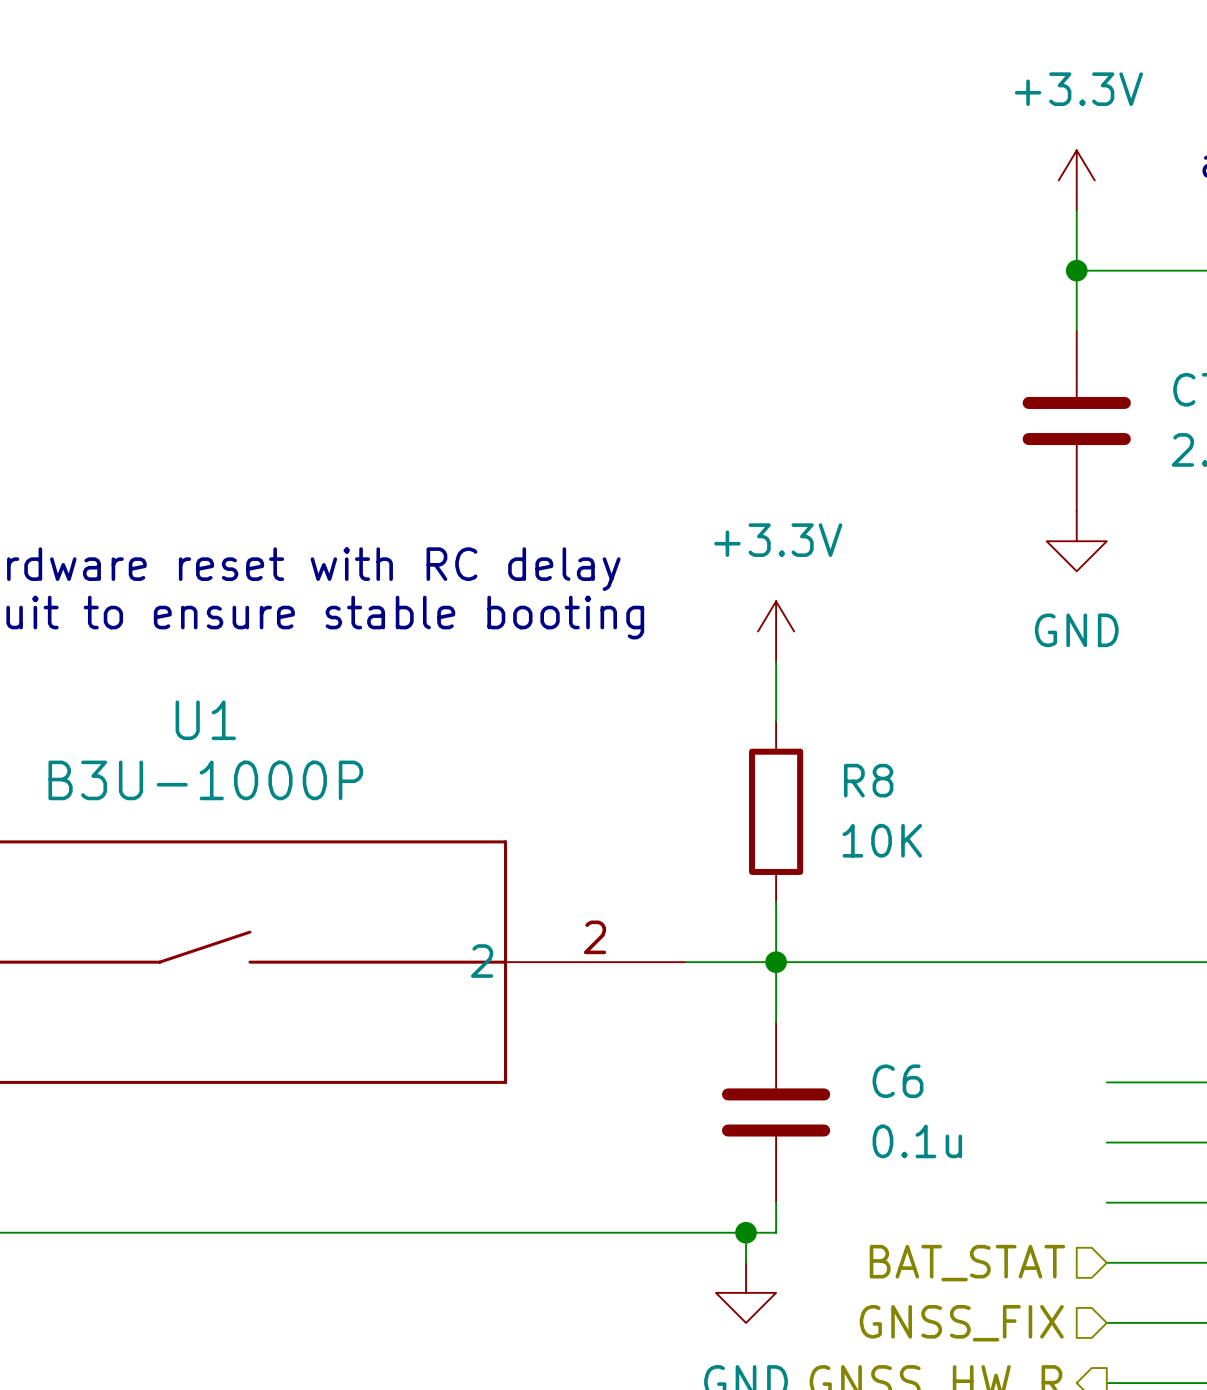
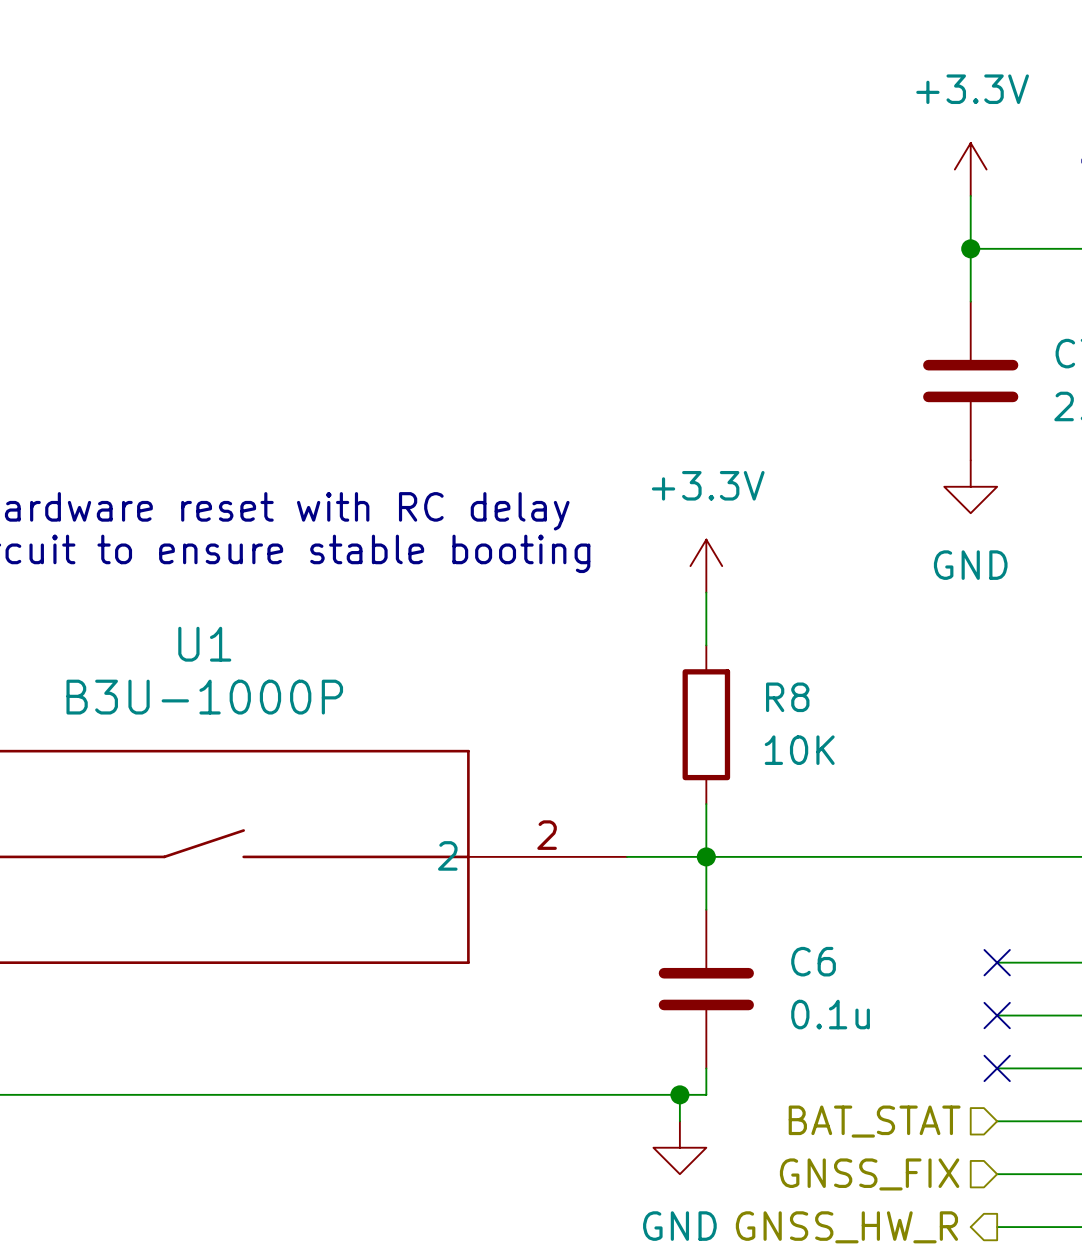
no-connect mark: none -> (997, 962)
no-connect mark: none -> (997, 1015)
no-connect mark: none -> (997, 1068)

